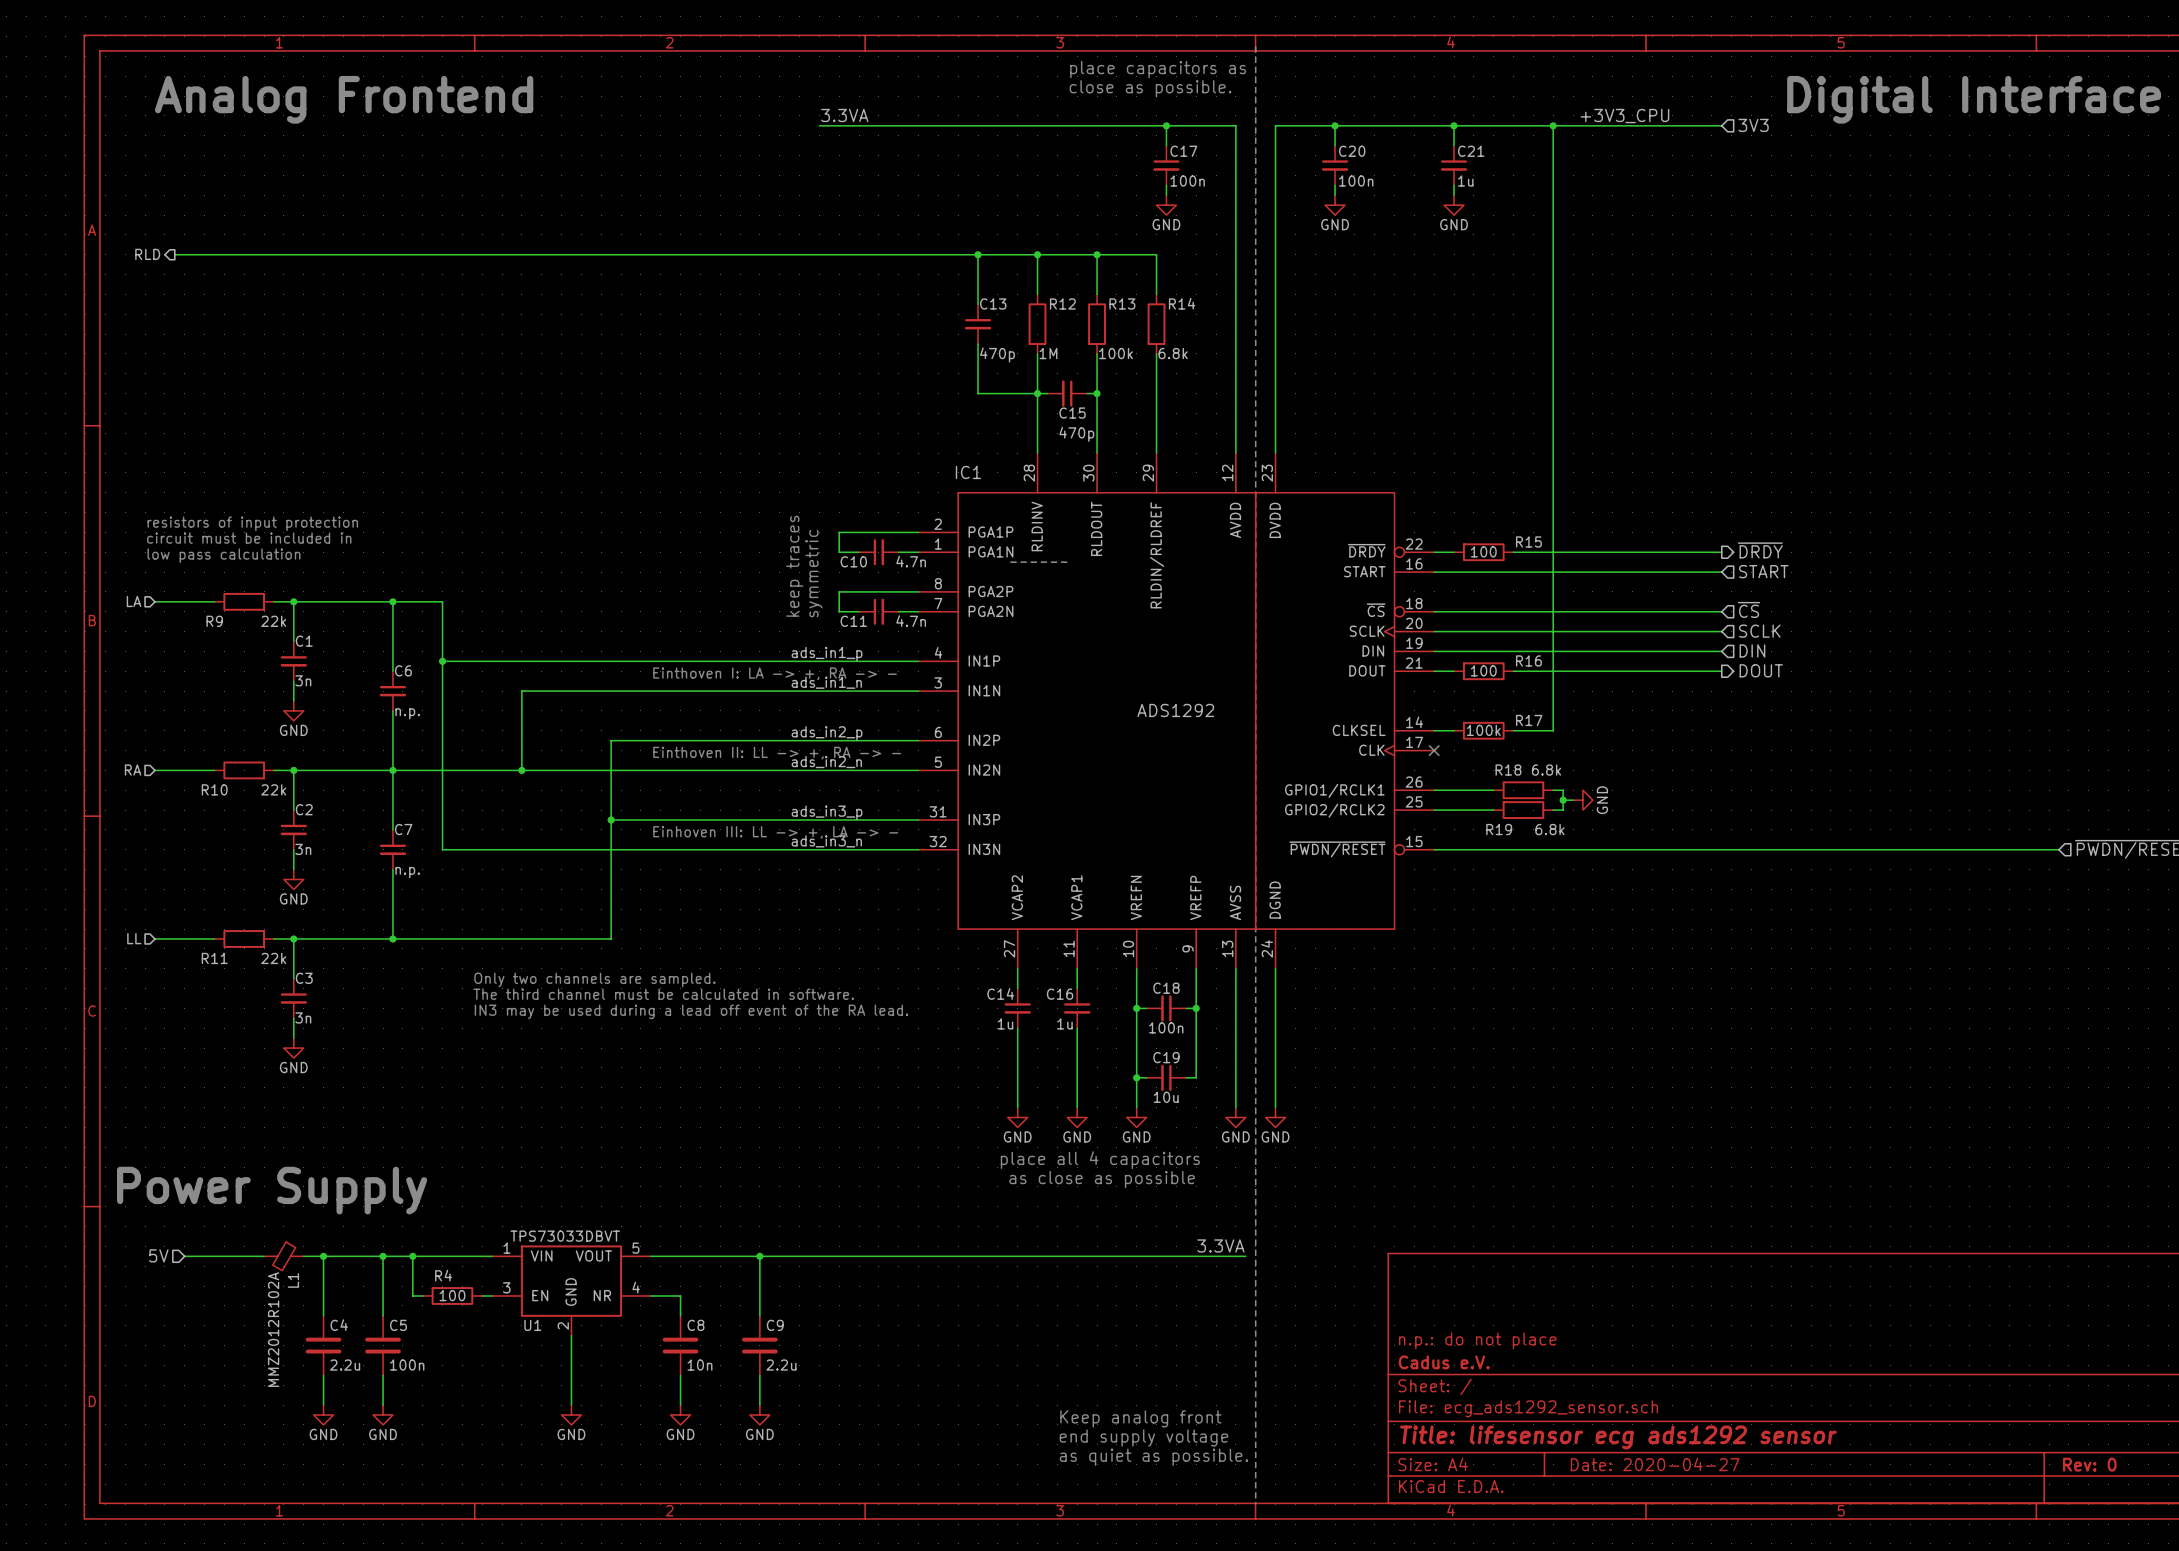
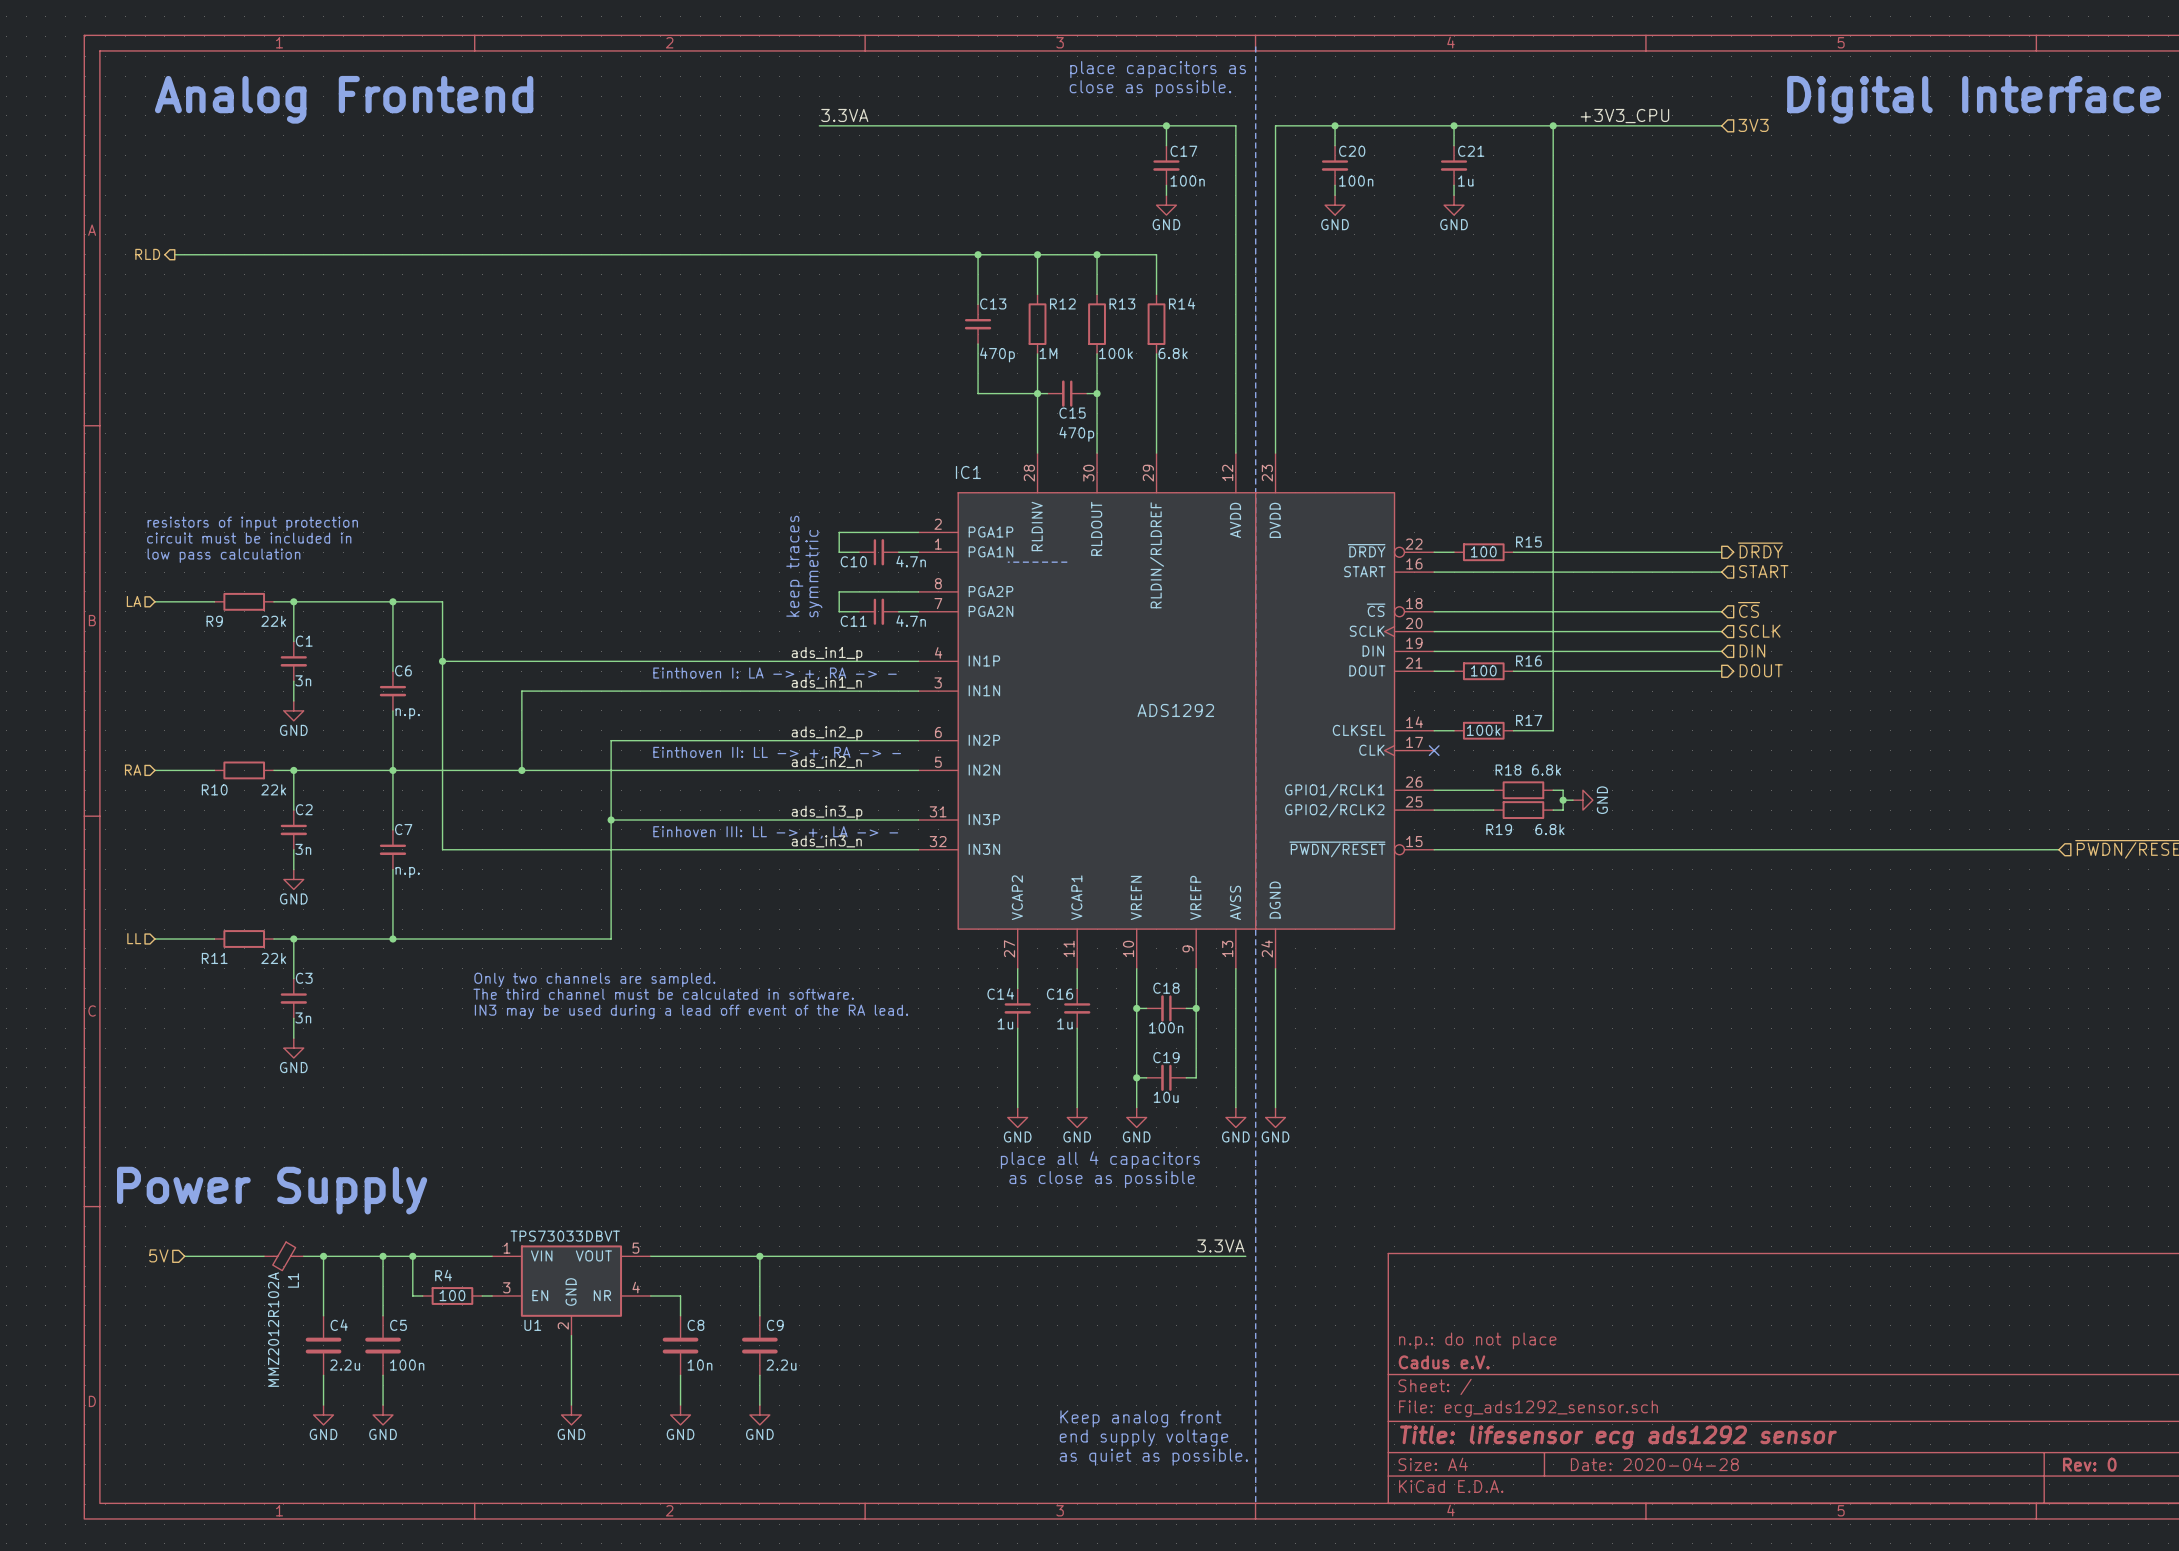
title block: Date: 2020-04-27 (1655, 1464) -> Date: 2020-04-28 (1654, 1464)

